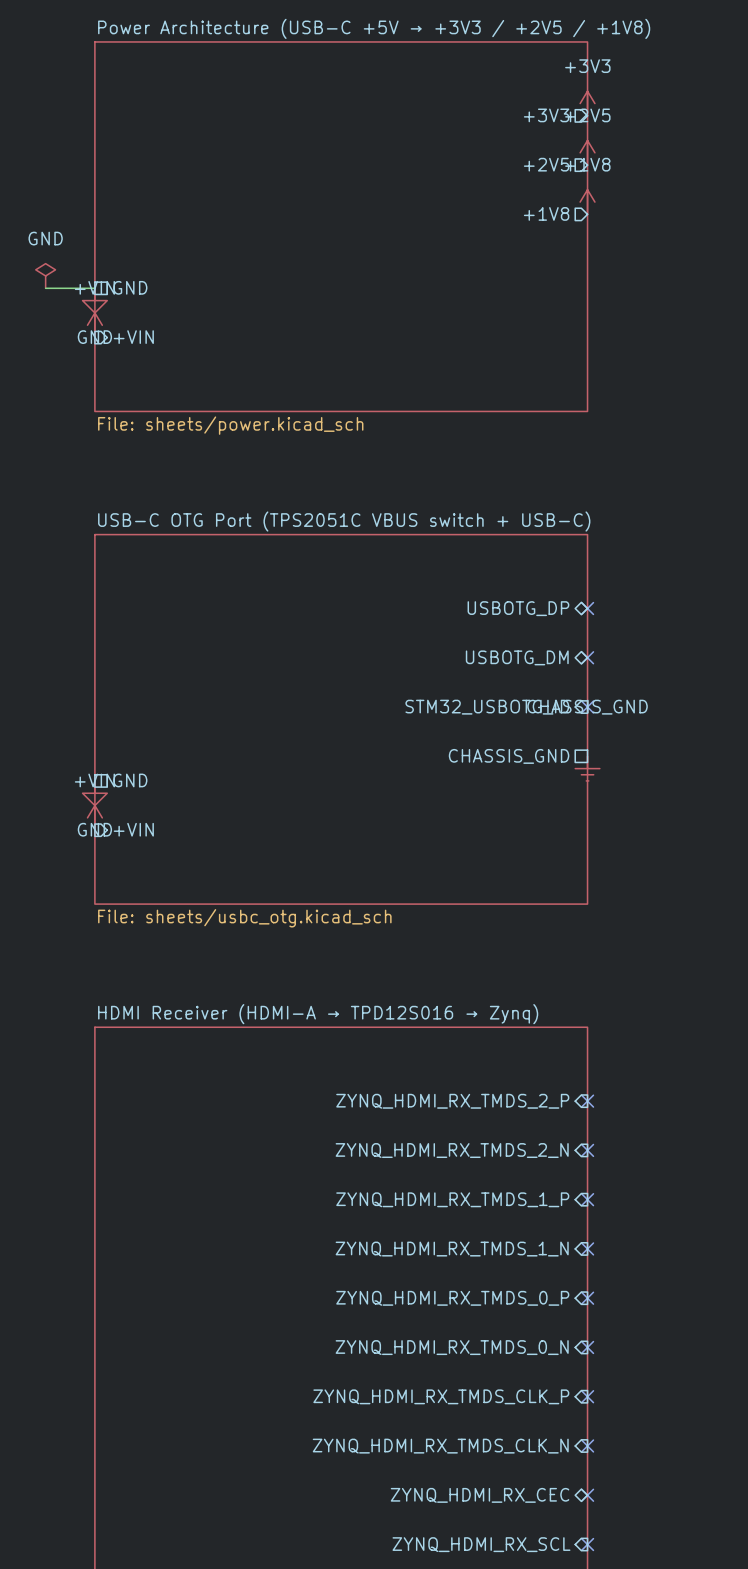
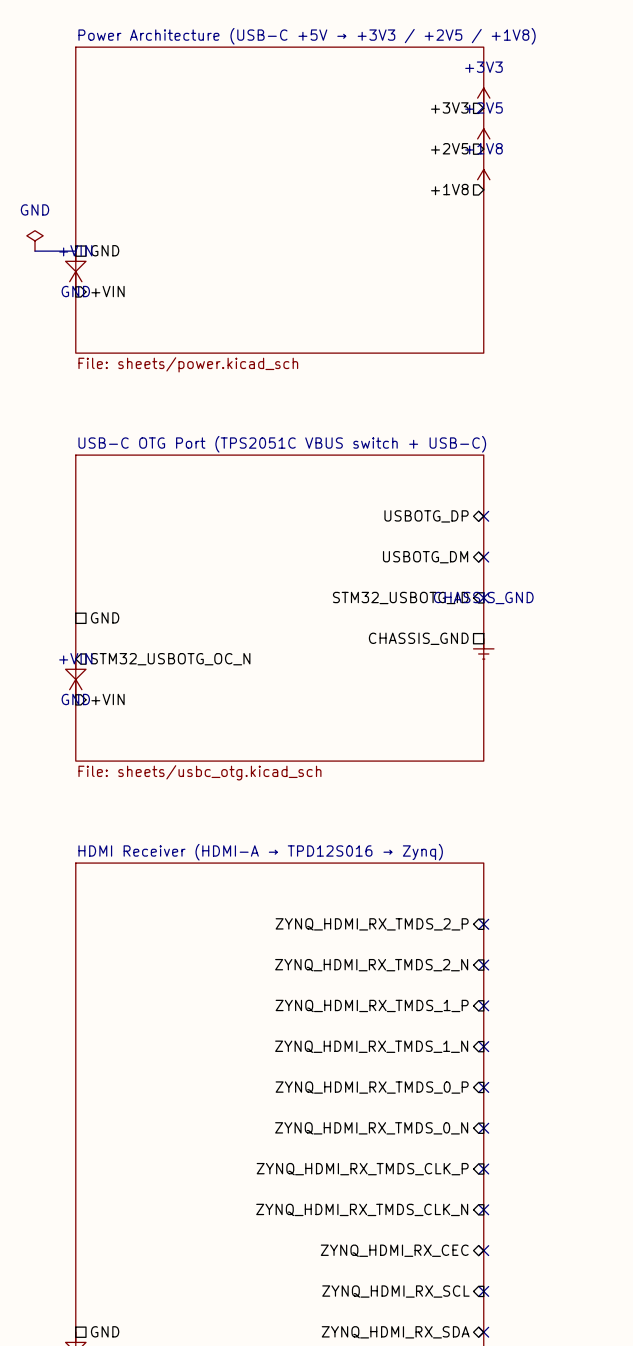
sheet pin: none -> GND (105, 617)
sheet pin shape: passive (130, 780) -> output (170, 659)
sheet pin: GND (130, 780) -> STM32_USBOTG_OC_N (170, 659)

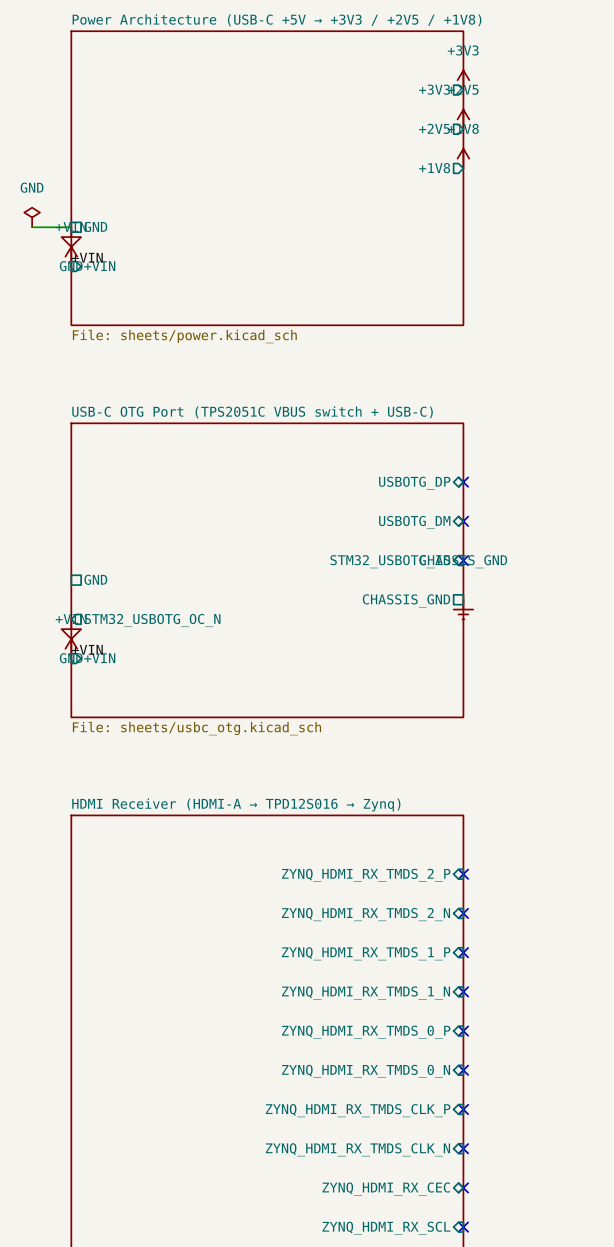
label: none -> +VIN (87, 257)
label: none -> +VIN (87, 649)

